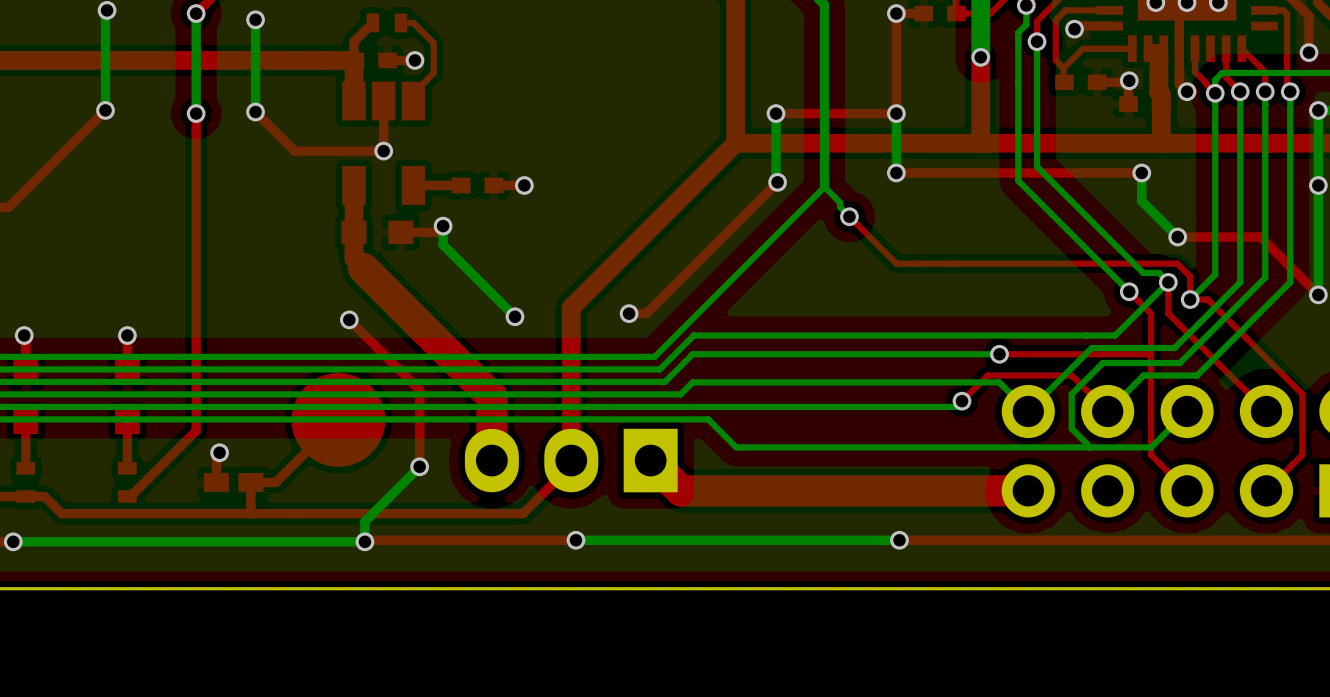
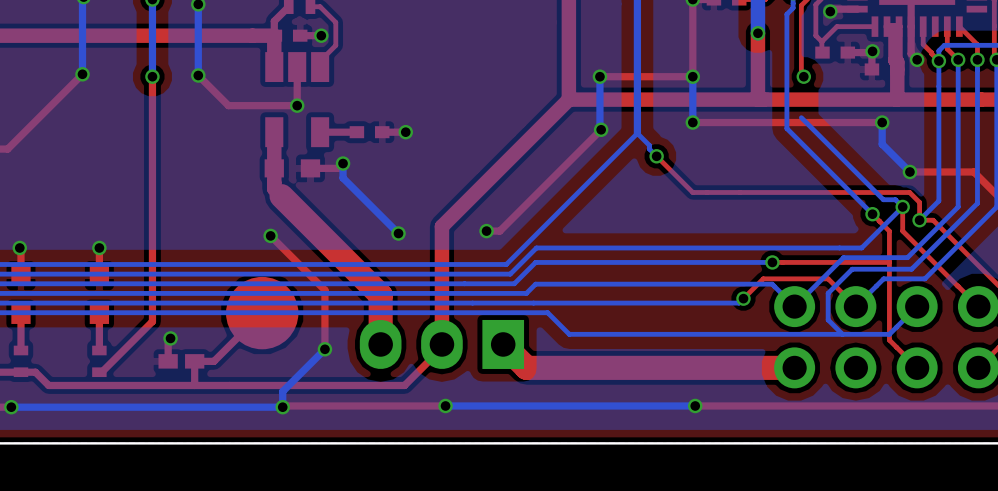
top track: none -> (801, 21) (801, 74) (803, 76)
bottom track: (1037, 41) (1037, 166) -> none
via position: (1037, 41) -> (803, 76)

